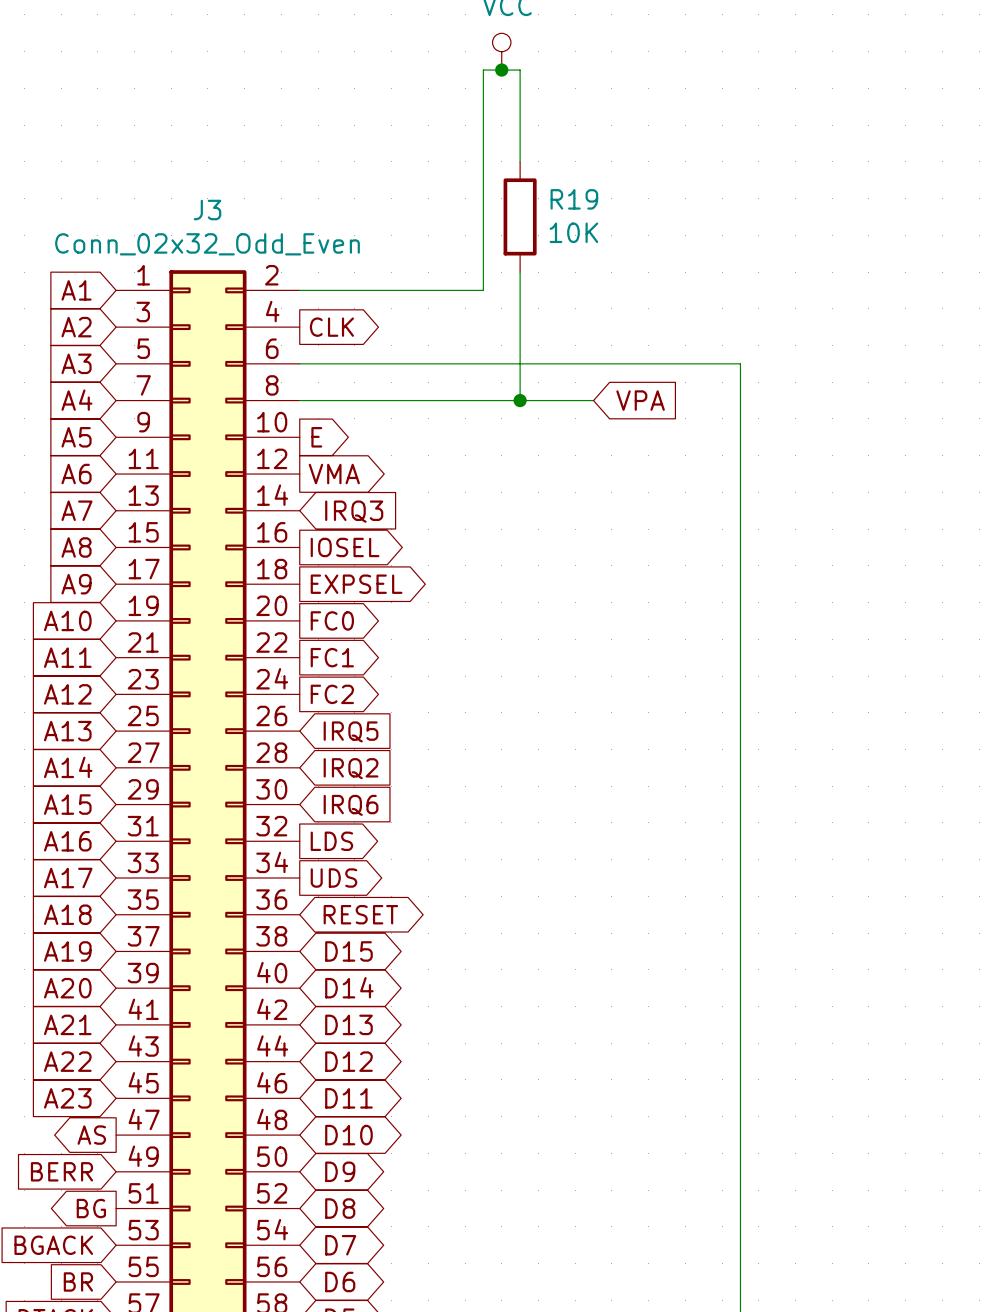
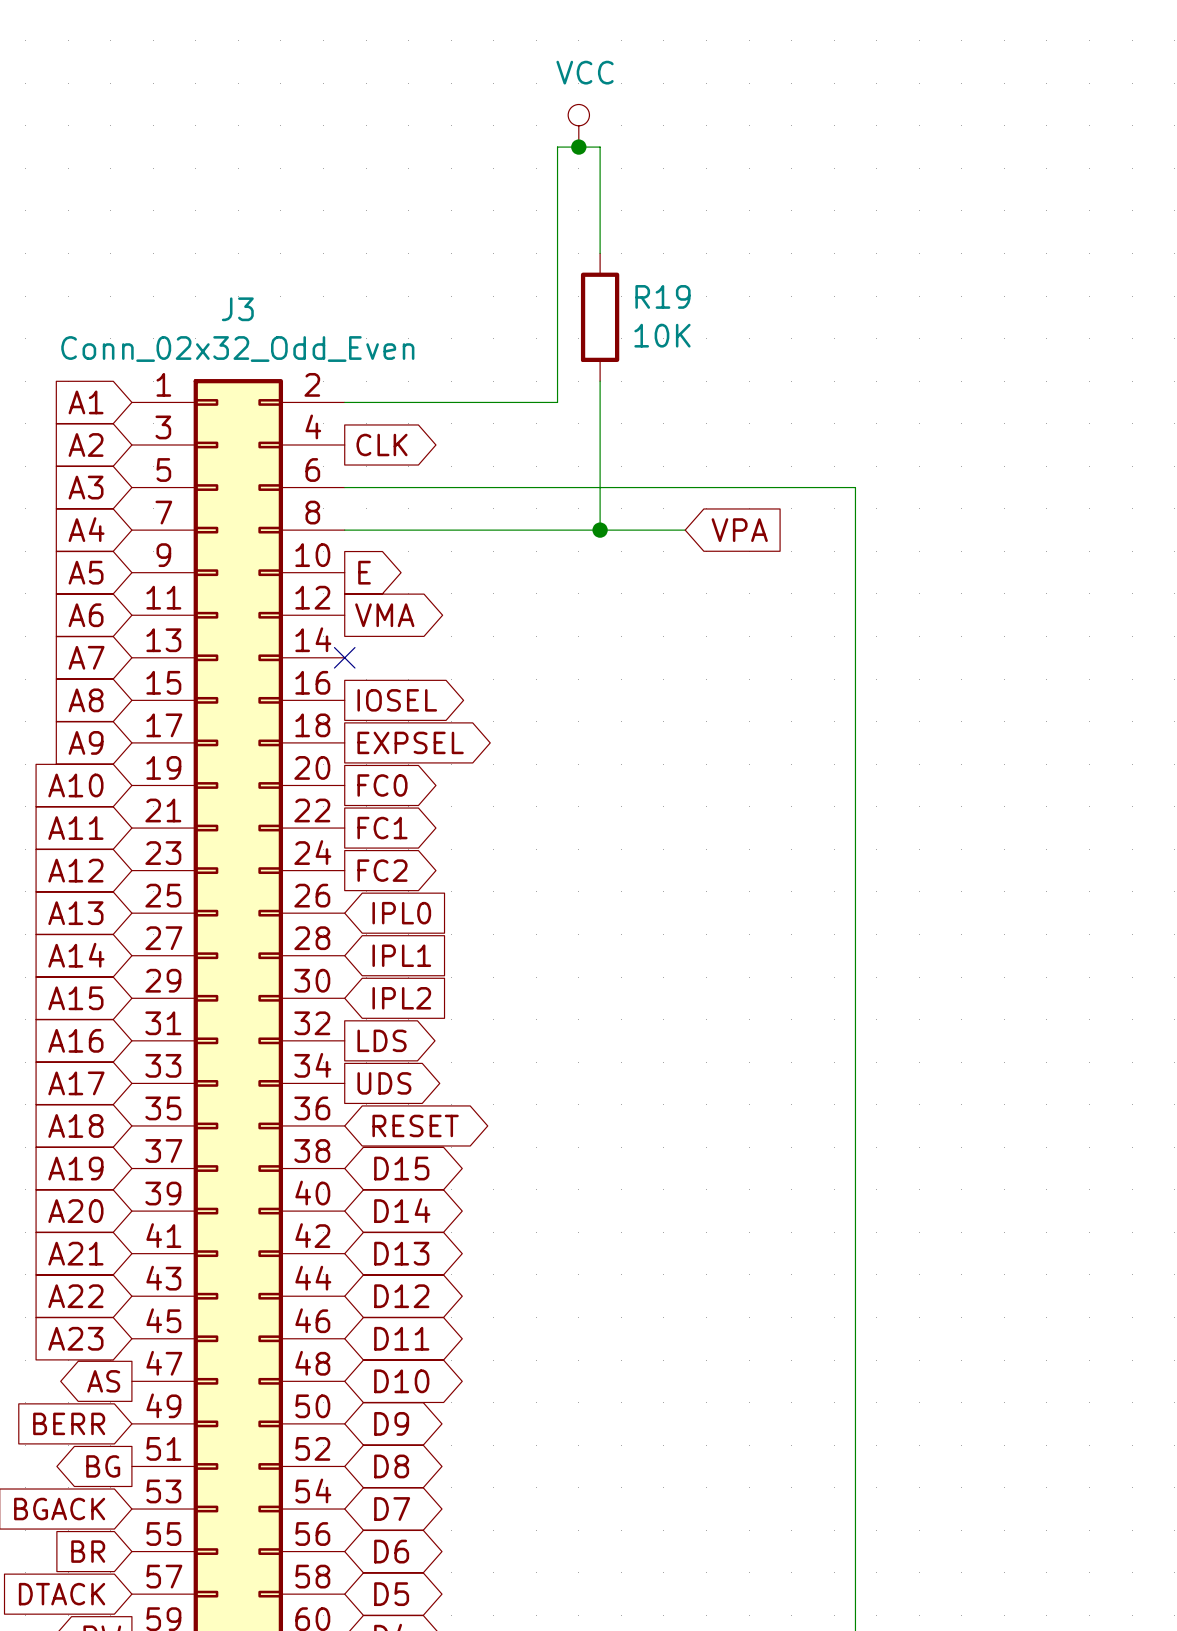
no-connect mark: none -> (344, 657)
global label: IRQ3 (354, 511) -> none
global label: IRQ5 (351, 731) -> IPL0 (401, 913)
global label: IRQ2 (351, 768) -> IPL1 (401, 955)
global label: IRQ6 (351, 805) -> IPL2 (401, 998)

